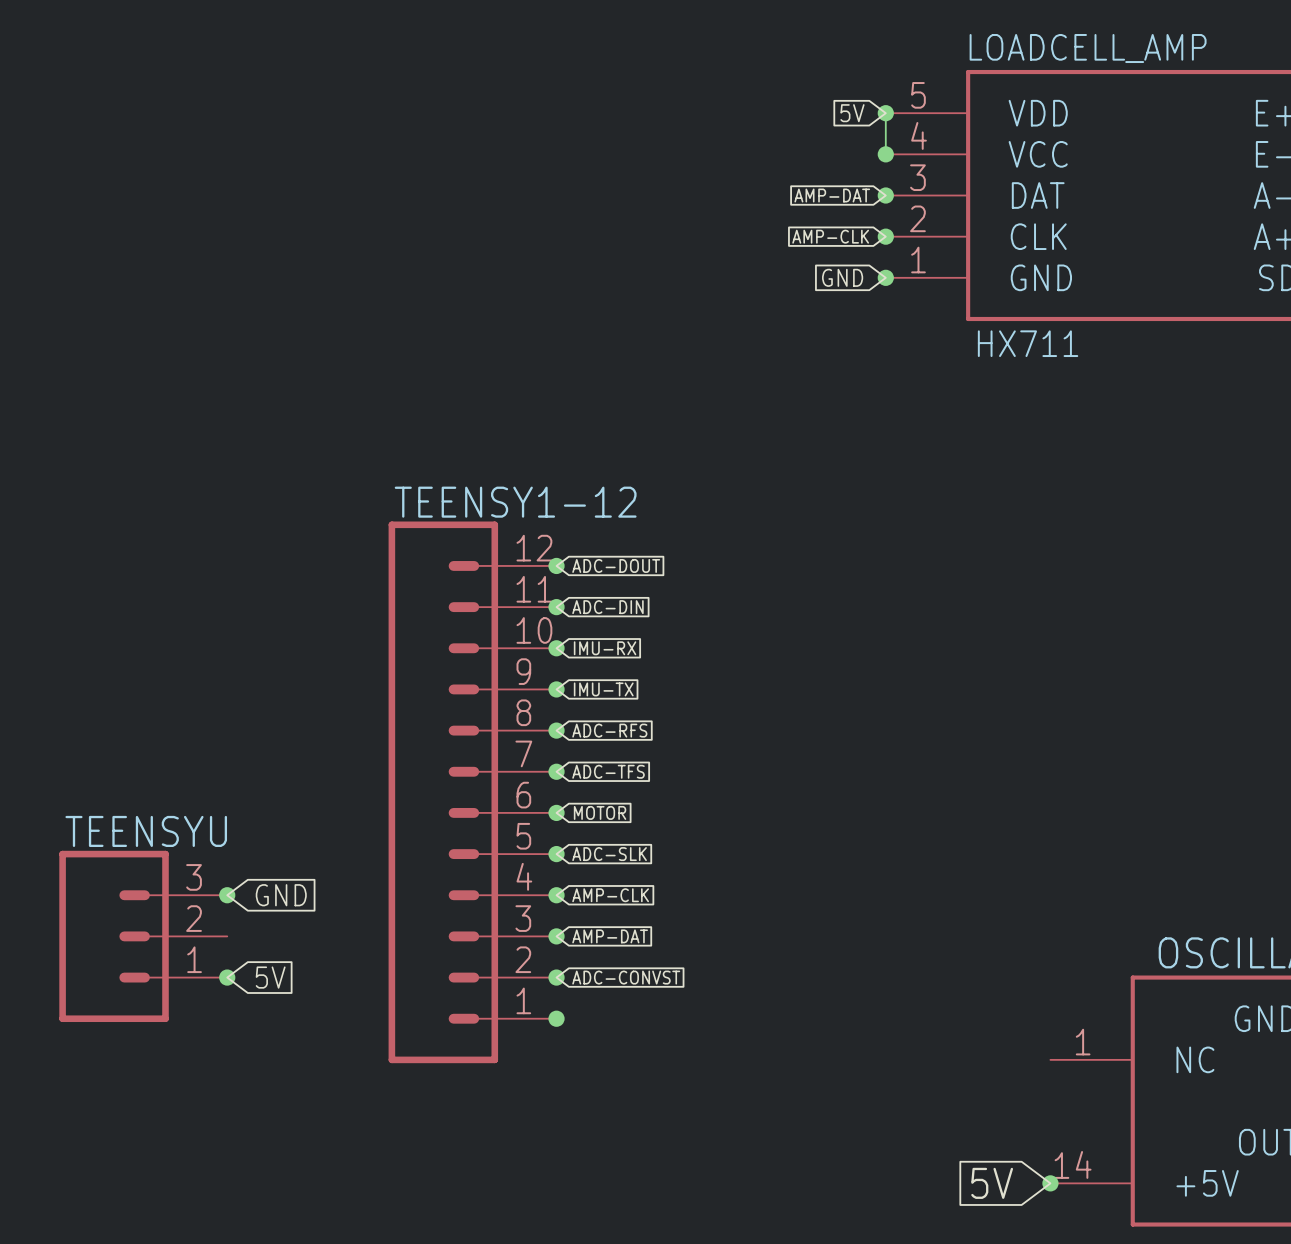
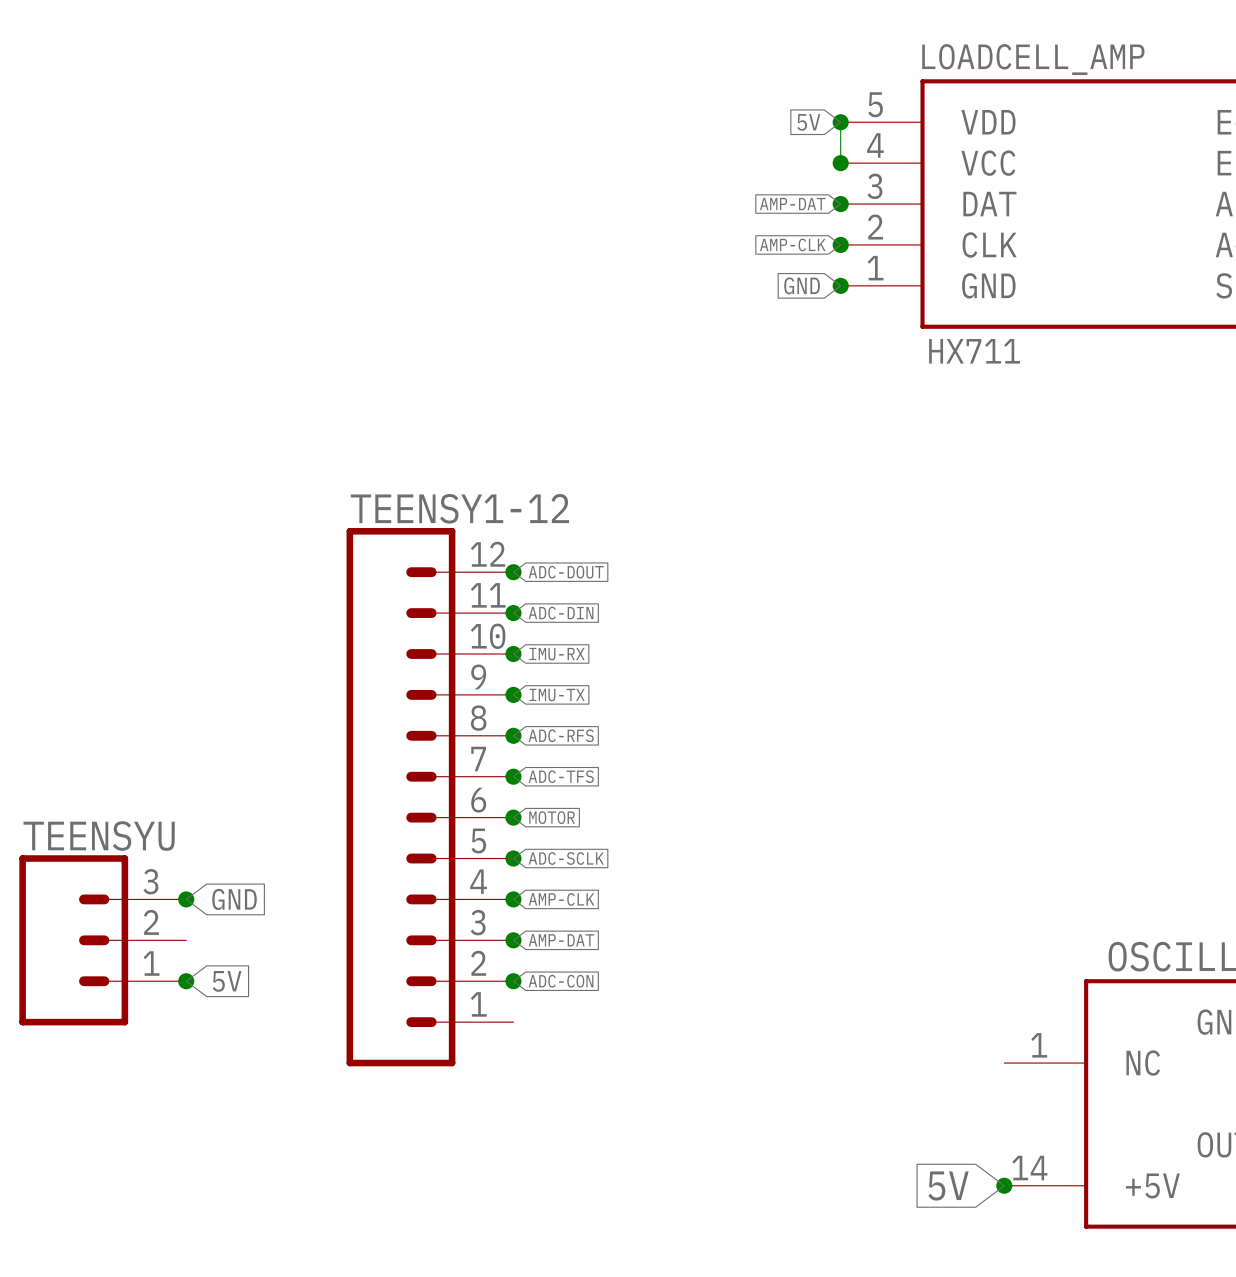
global label: ADC-SLK (609, 854) -> ADC-SCLK (566, 858)
global label: ADC-CONVST (626, 977) -> ADC-CON (561, 981)
junction: (556, 1018) -> none

